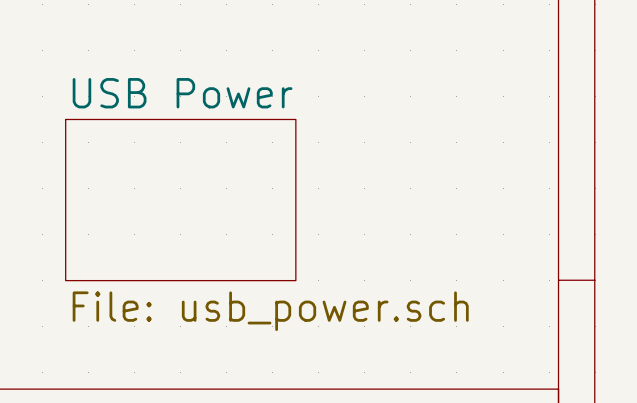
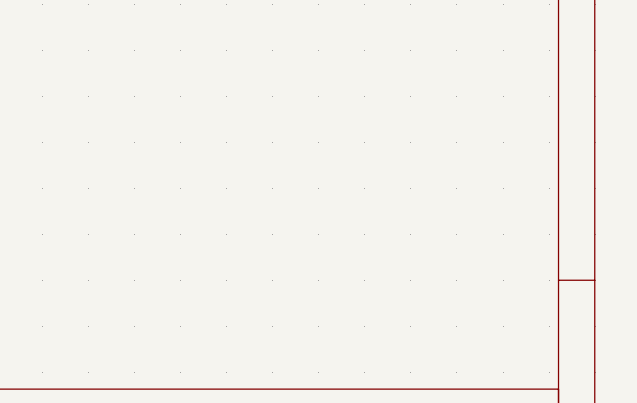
sheet USB Power: File: usb_power.sch (180, 200) -> none

